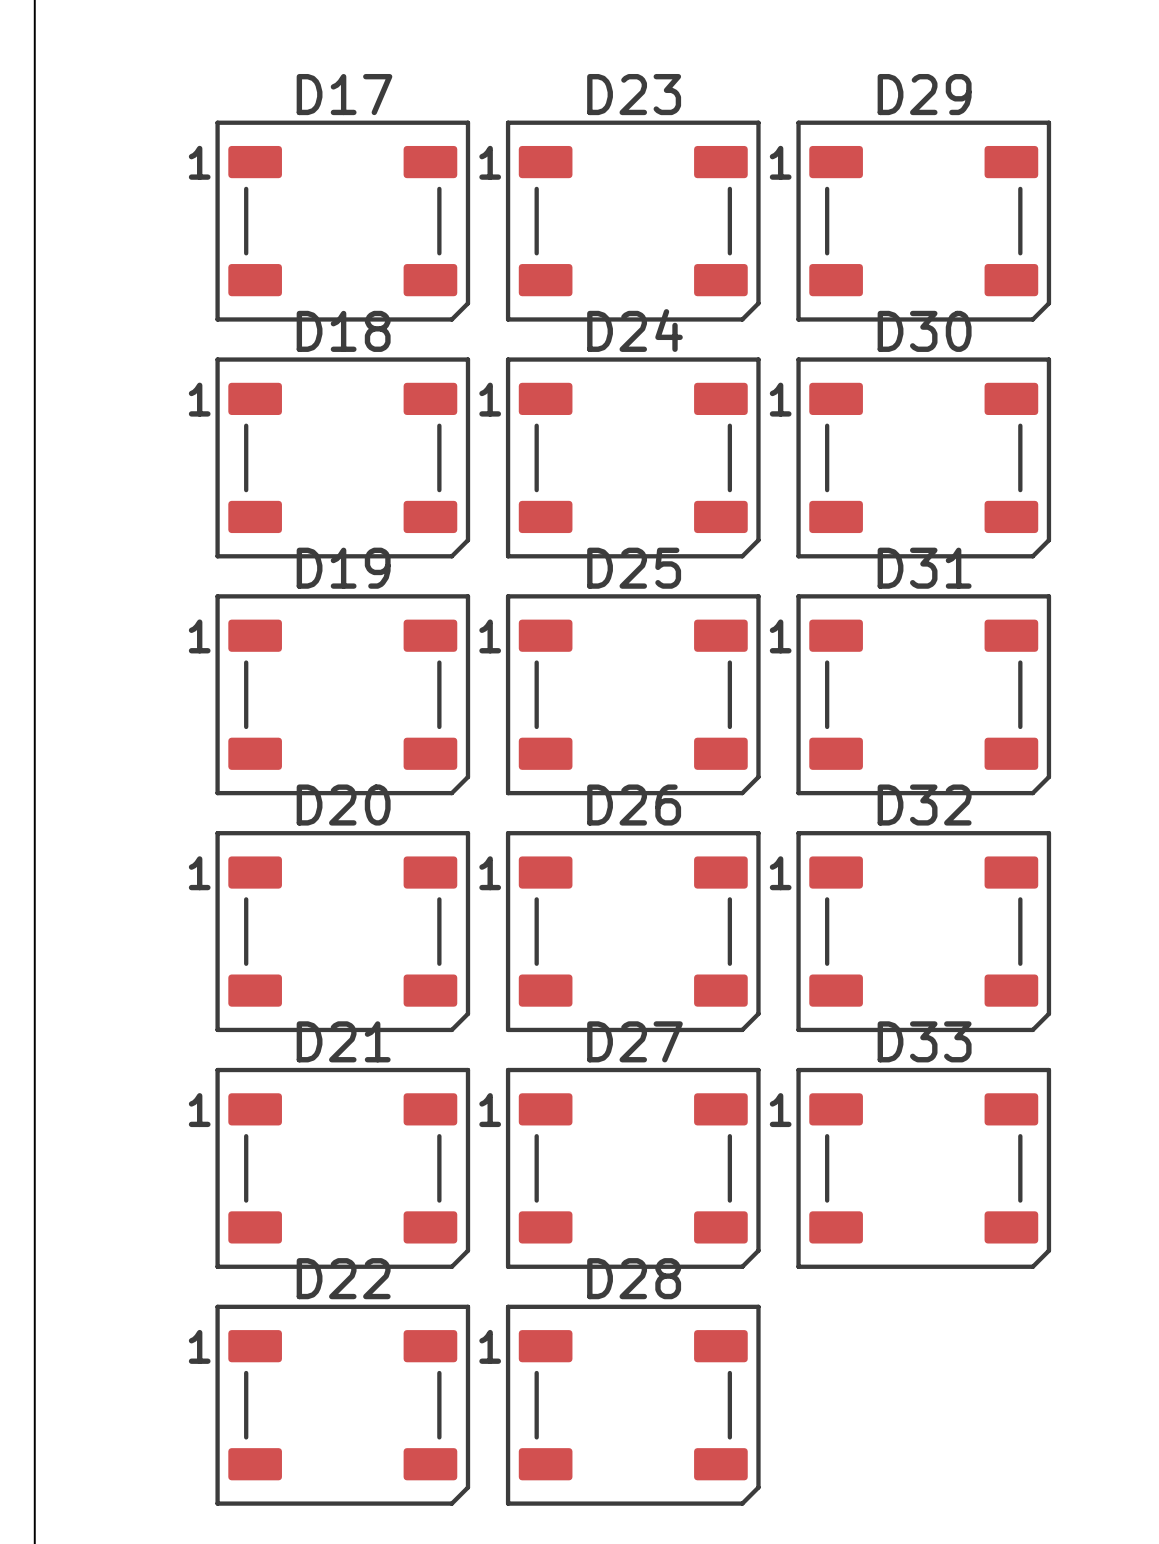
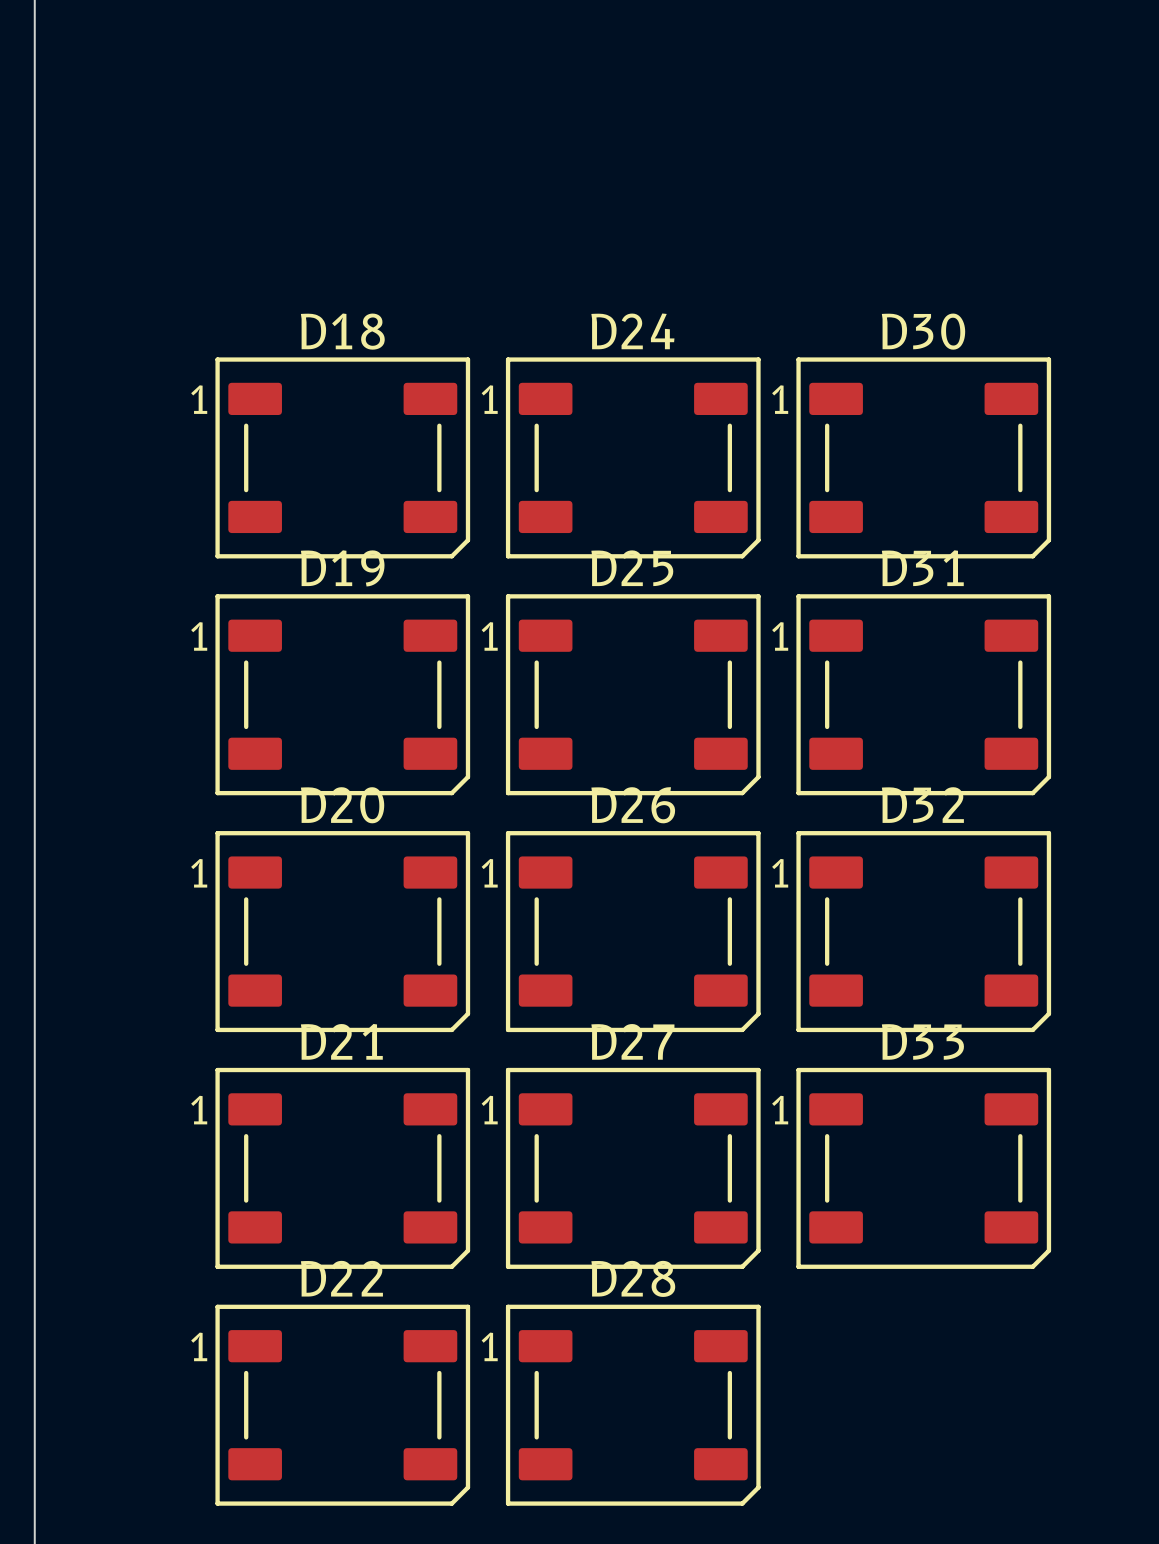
D17: (342, 221) -> none
D23: (633, 221) -> none
D29: (923, 221) -> none

